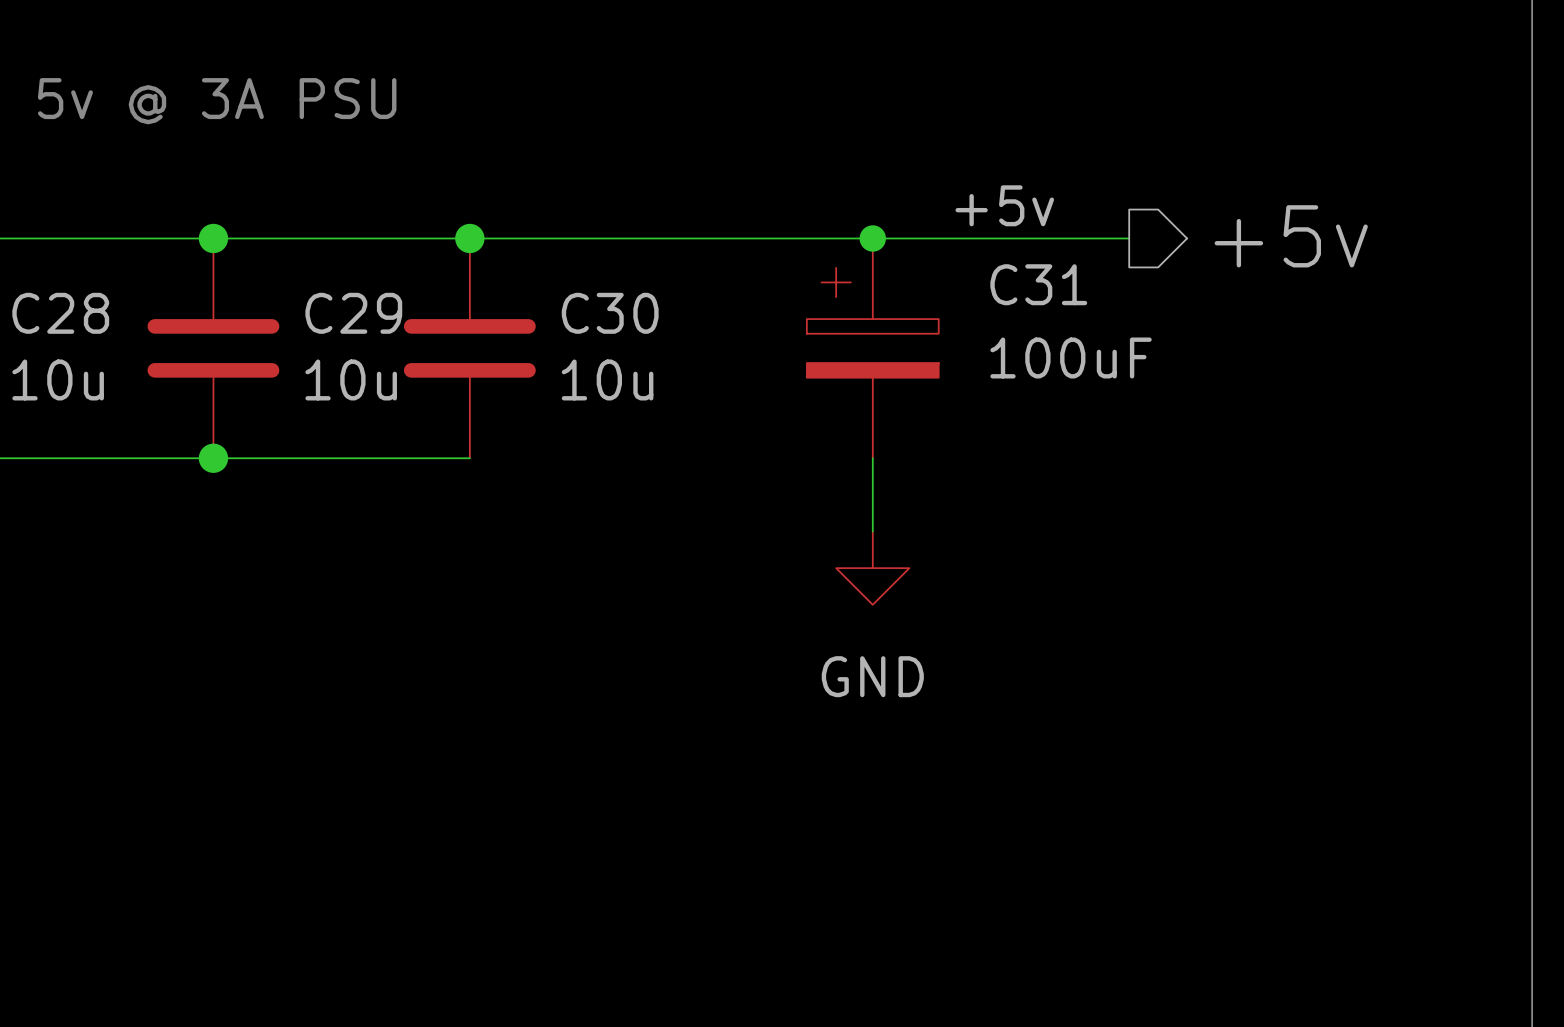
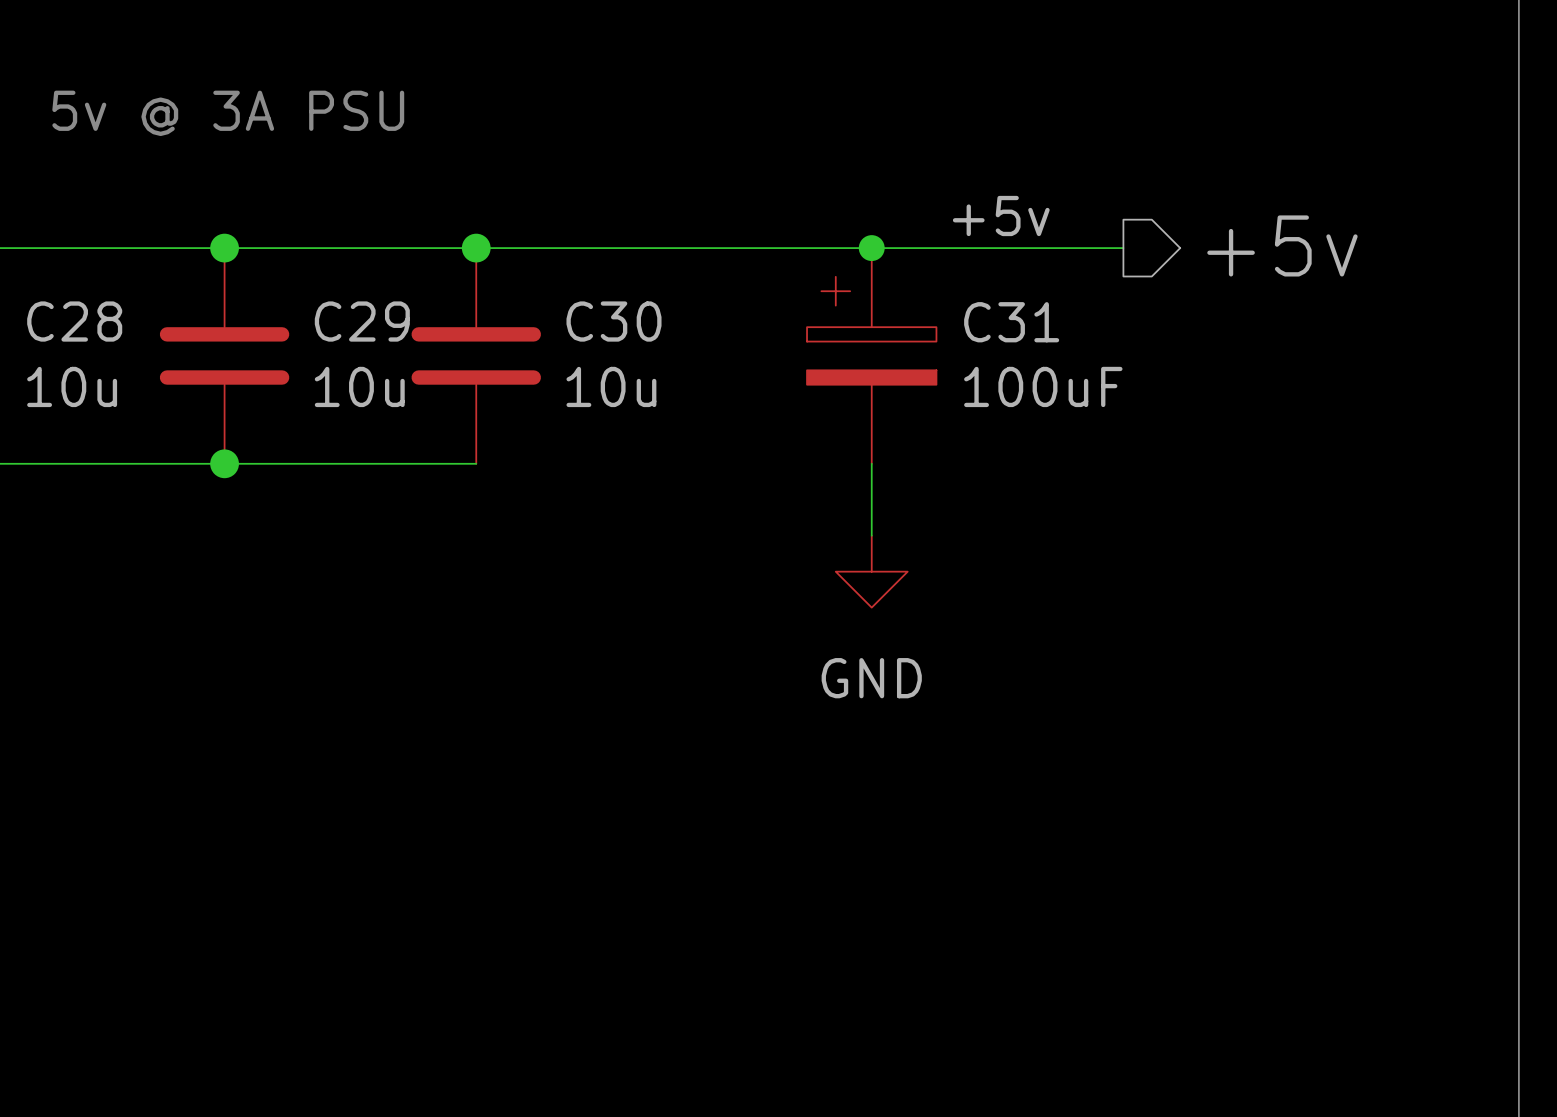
C31 name position: C31 (1038, 284) -> C31 (1011, 322)
C31 value position: 100uF (1071, 357) -> 100uF (1043, 386)

